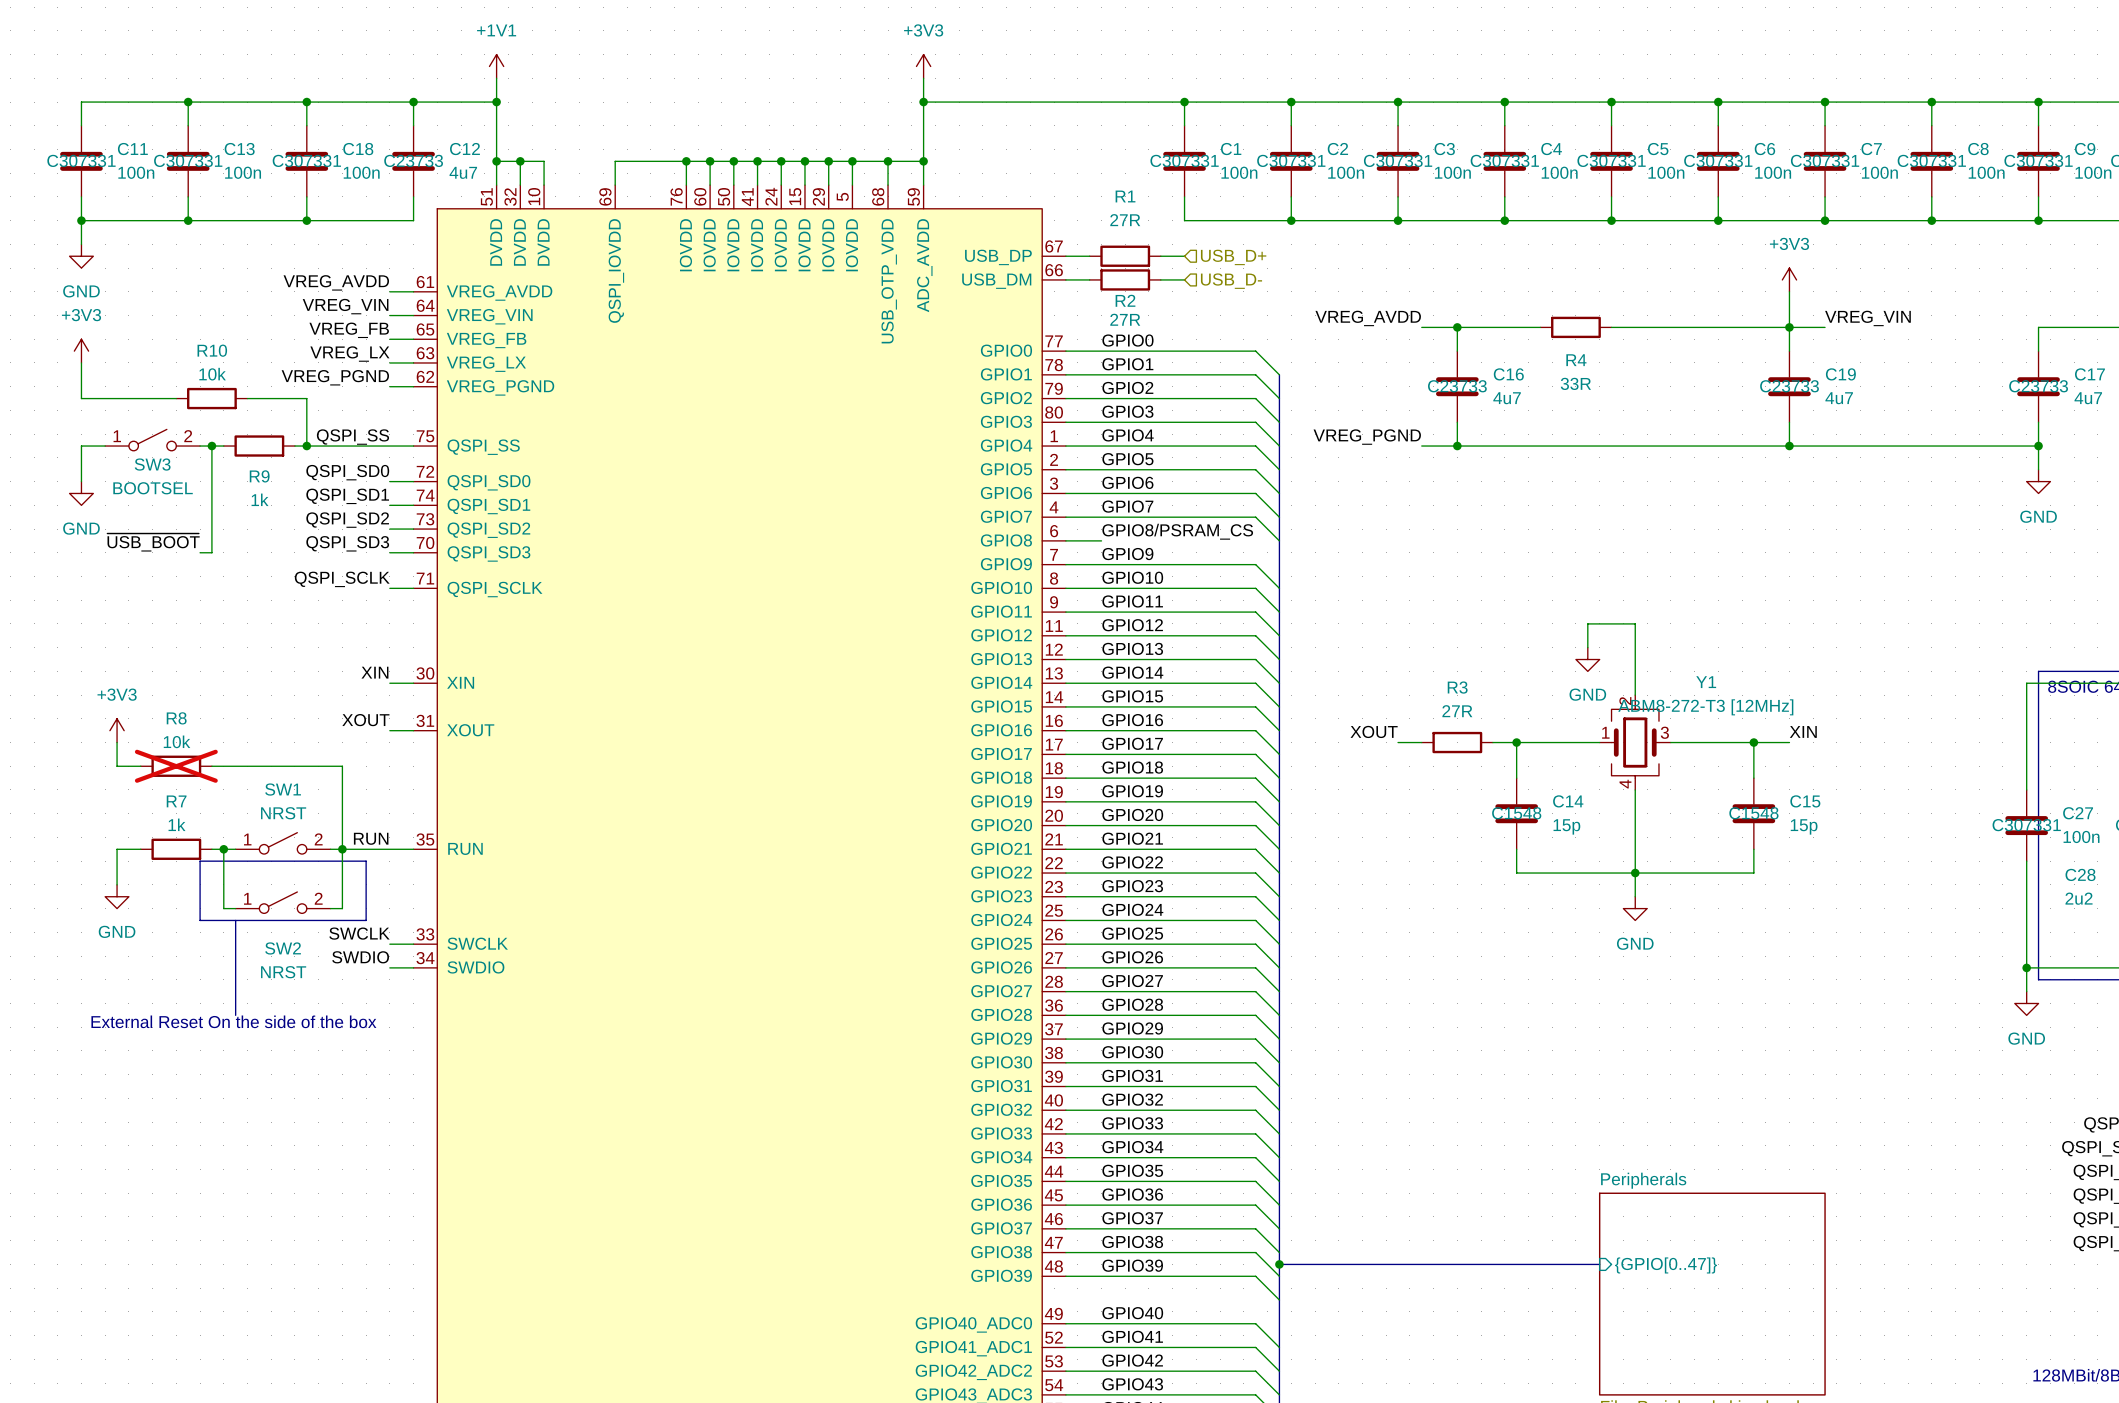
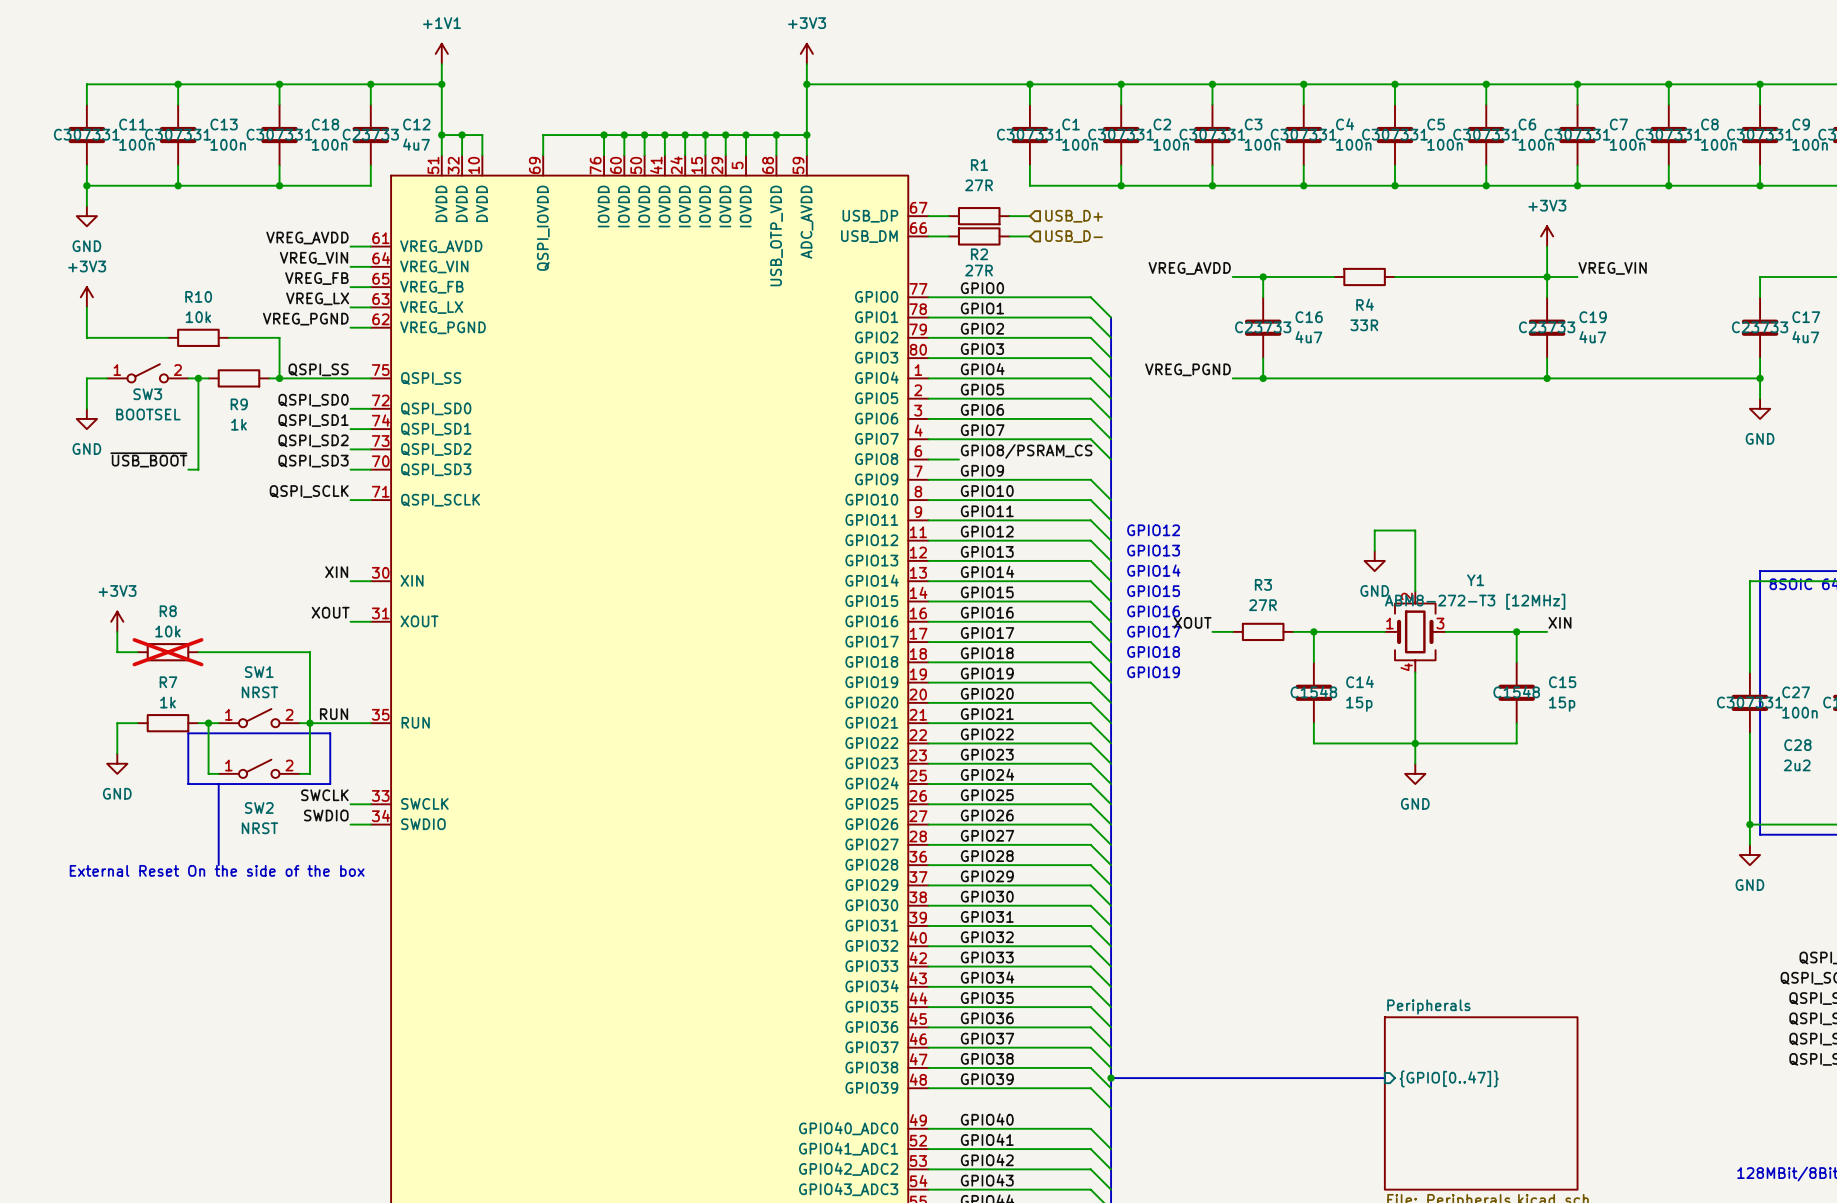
text: none -> GPIO12 (1153, 530)
text: none -> GPIO13 (1153, 550)
text: none -> GPIO14 (1153, 570)
text: none -> GPIO15 (1153, 591)
text: none -> GPIO16 (1153, 611)
text: none -> GPIO17 (1153, 631)
text: none -> GPIO18 (1153, 652)
text: none -> GPIO19 (1153, 672)

